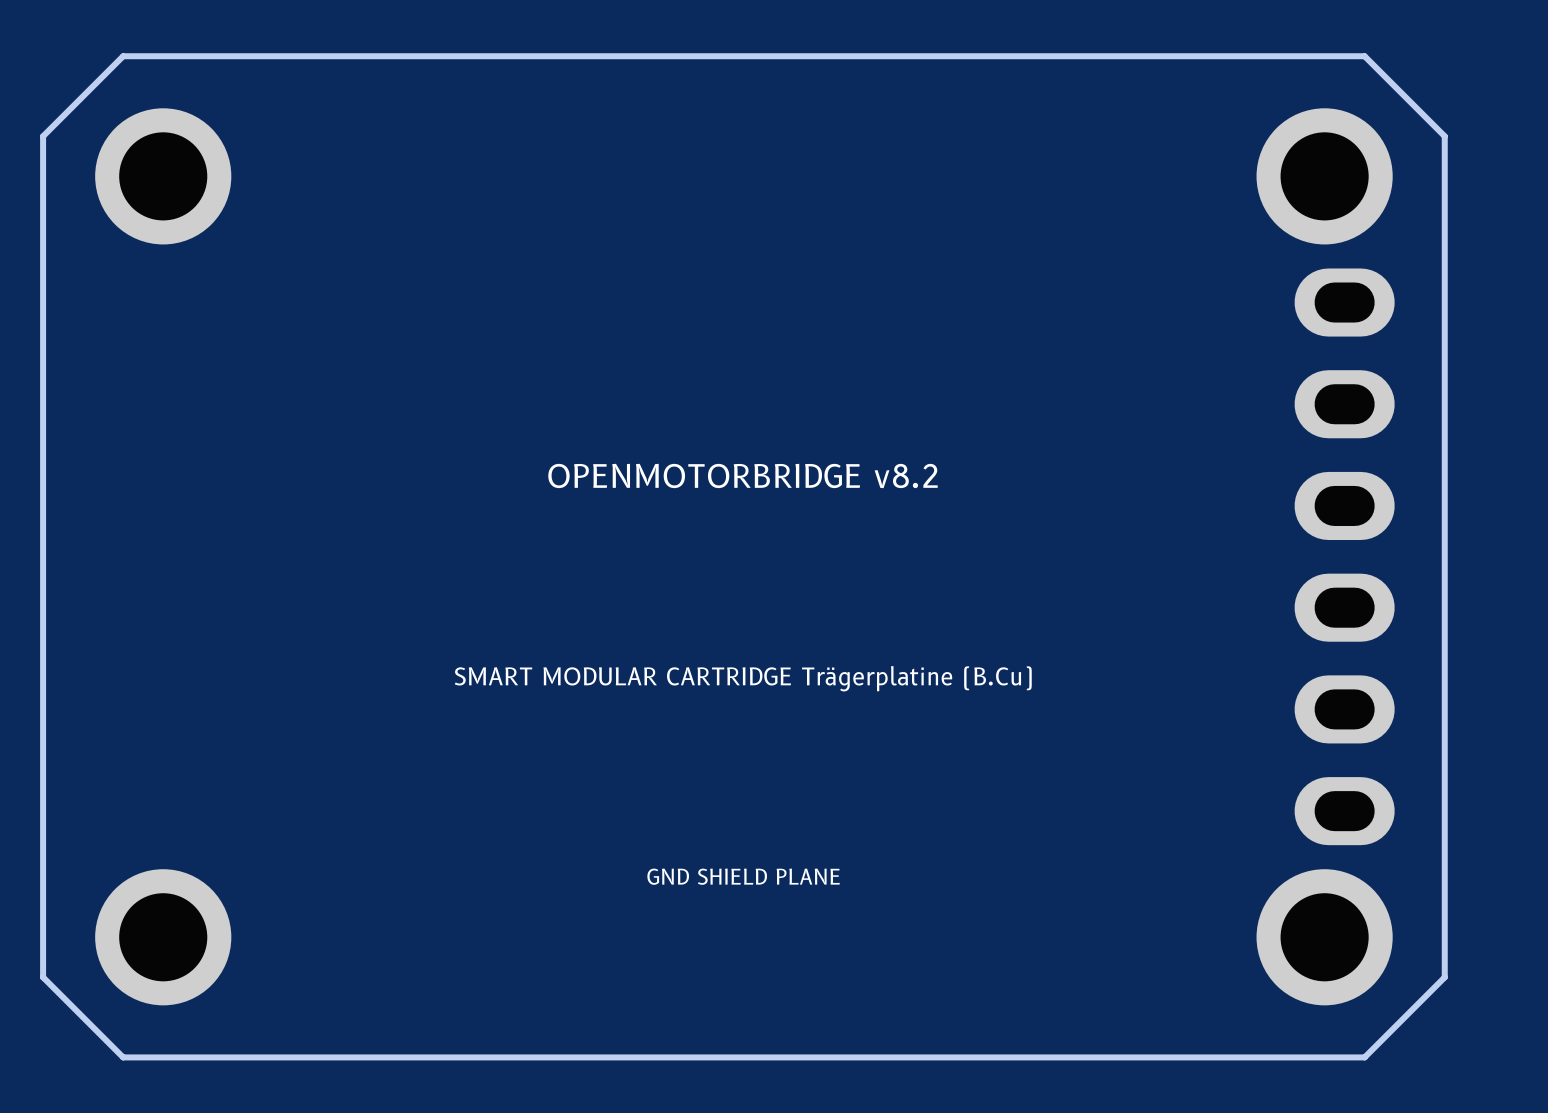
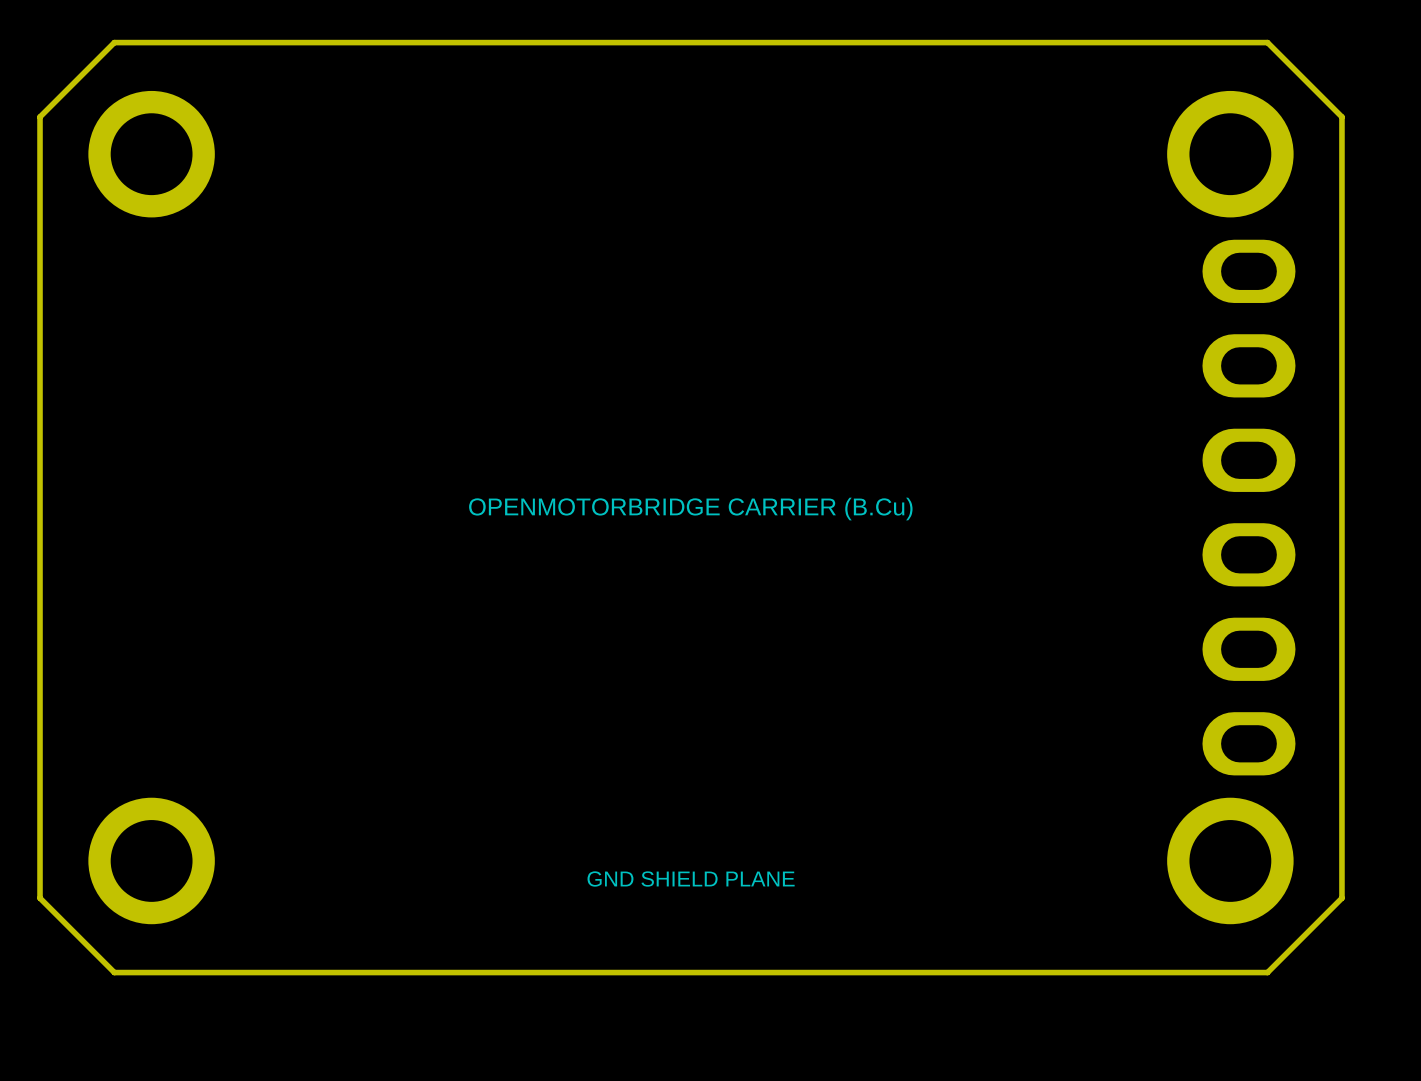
text: OPENMOTORBRIDGE v8.2 (742, 475) -> none
text: none -> OPENMOTORBRIDGE CARRIER (B.Cu) (690, 509)
text: SMART MODULAR CARTRIDGE Trägerplatine (B.Cu) (743, 678) -> none
text position: GND SHIELD PLANE (743, 876) -> GND SHIELD PLANE (691, 879)

